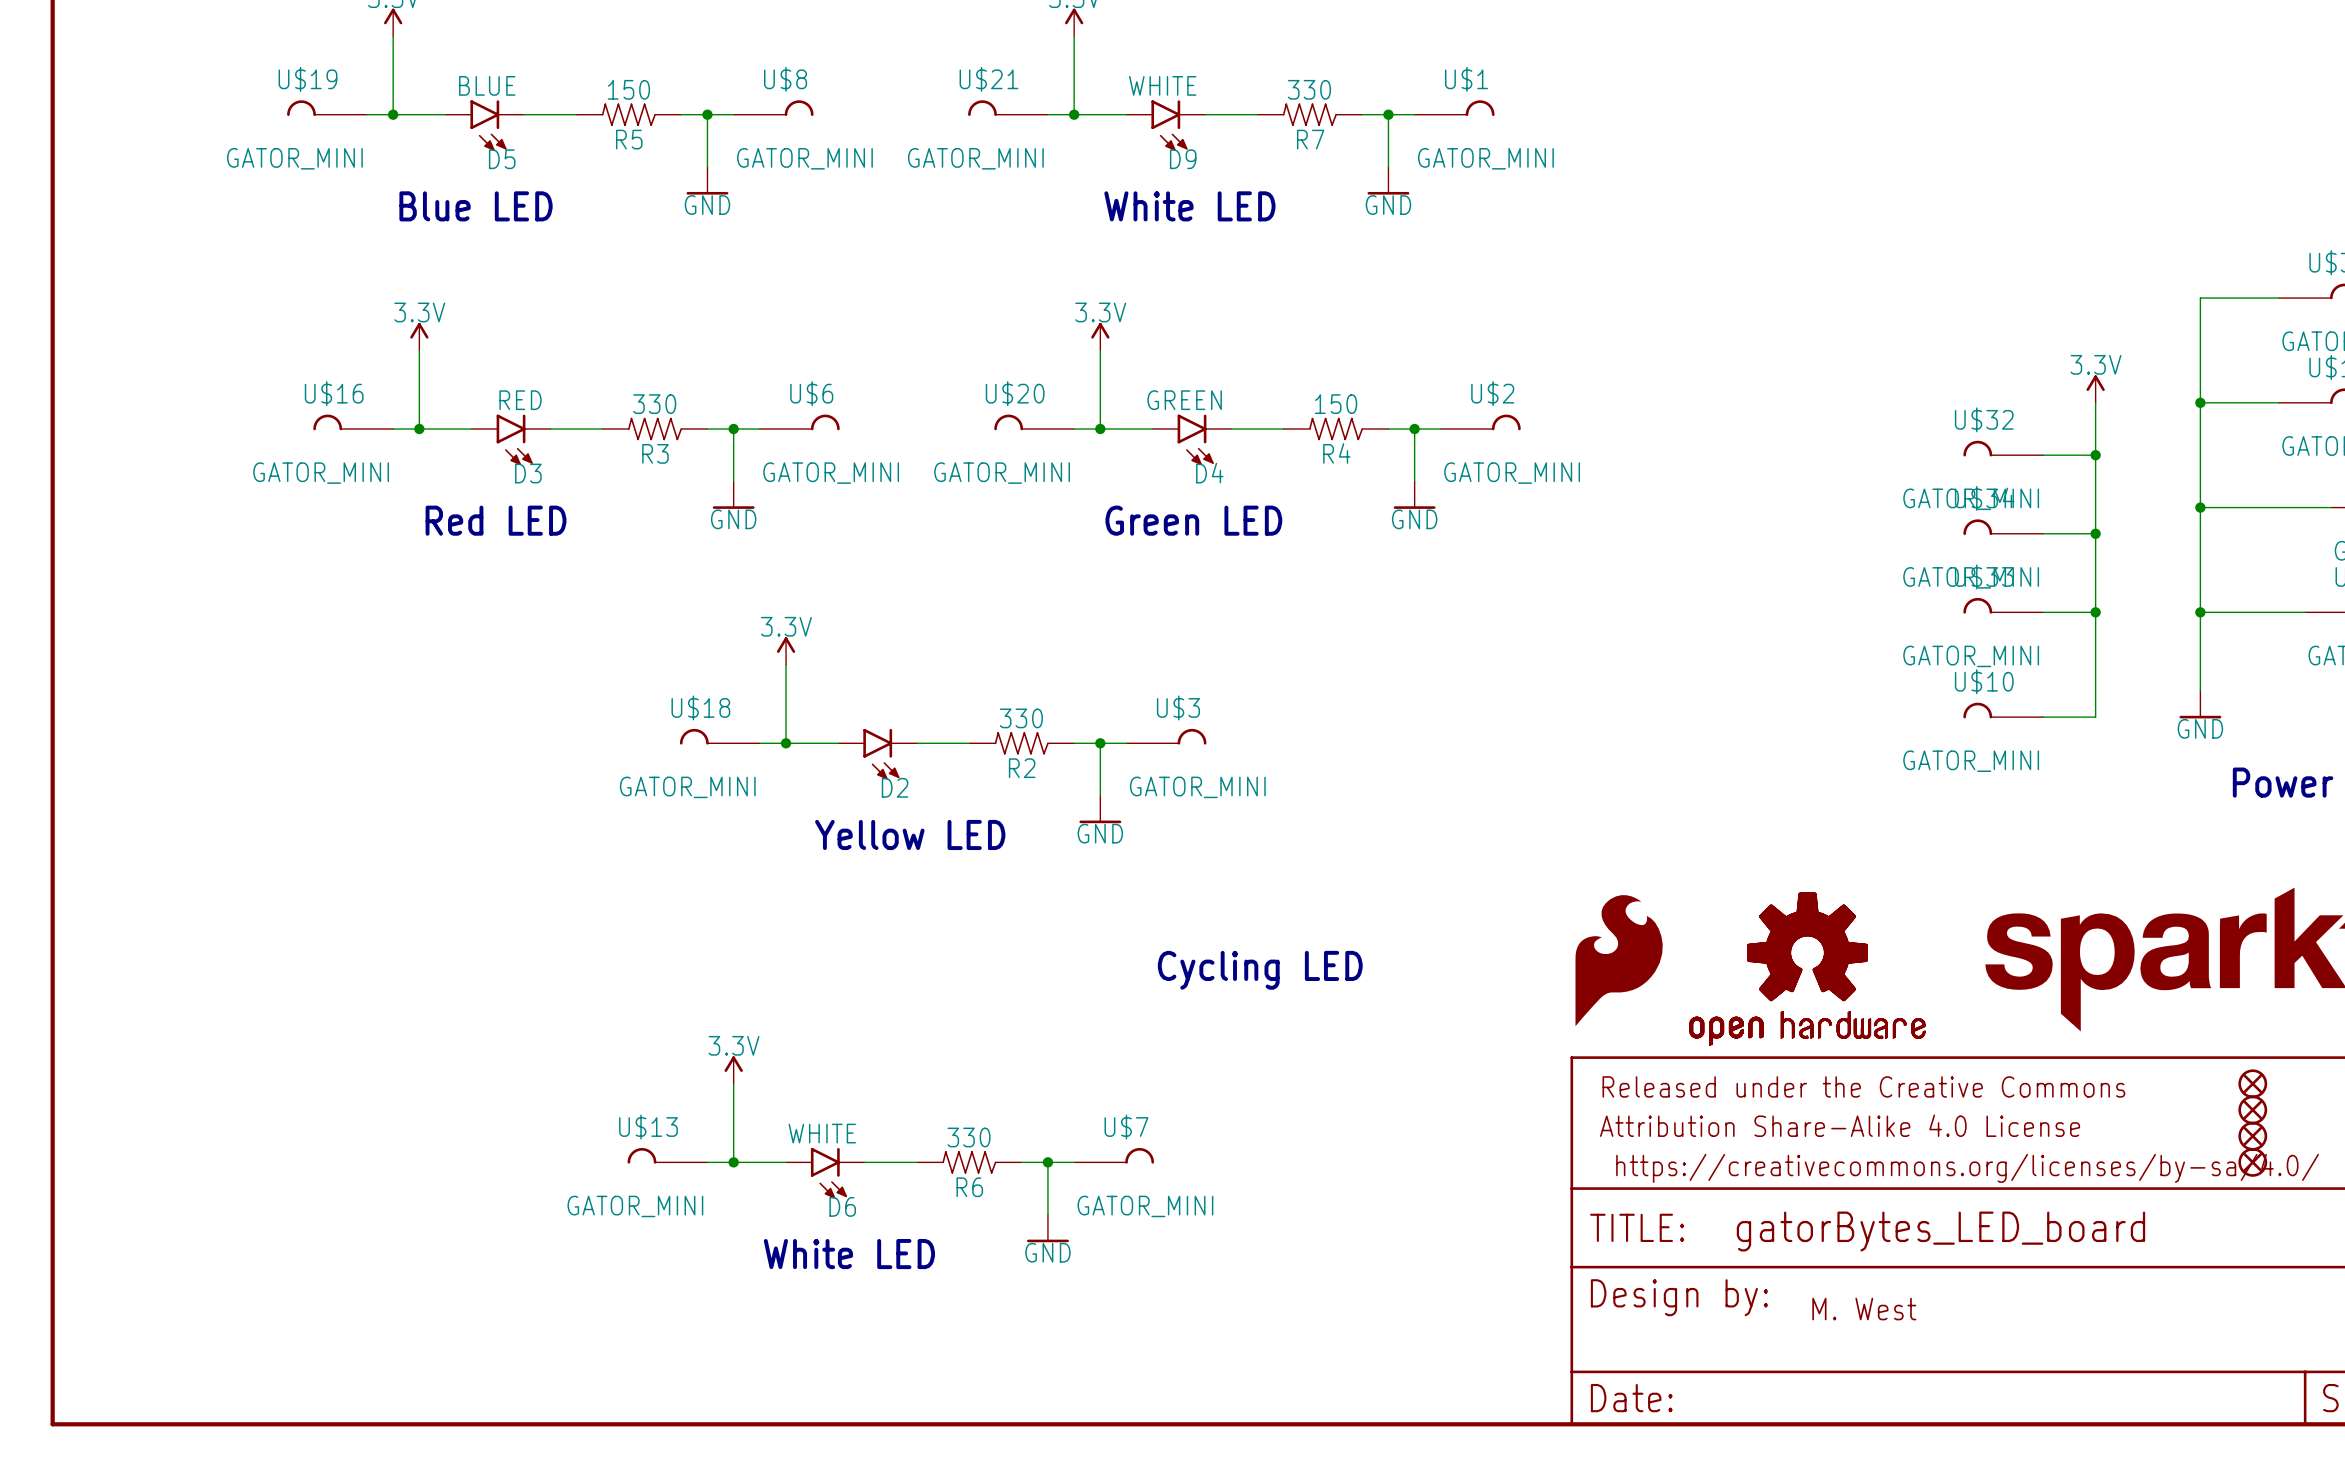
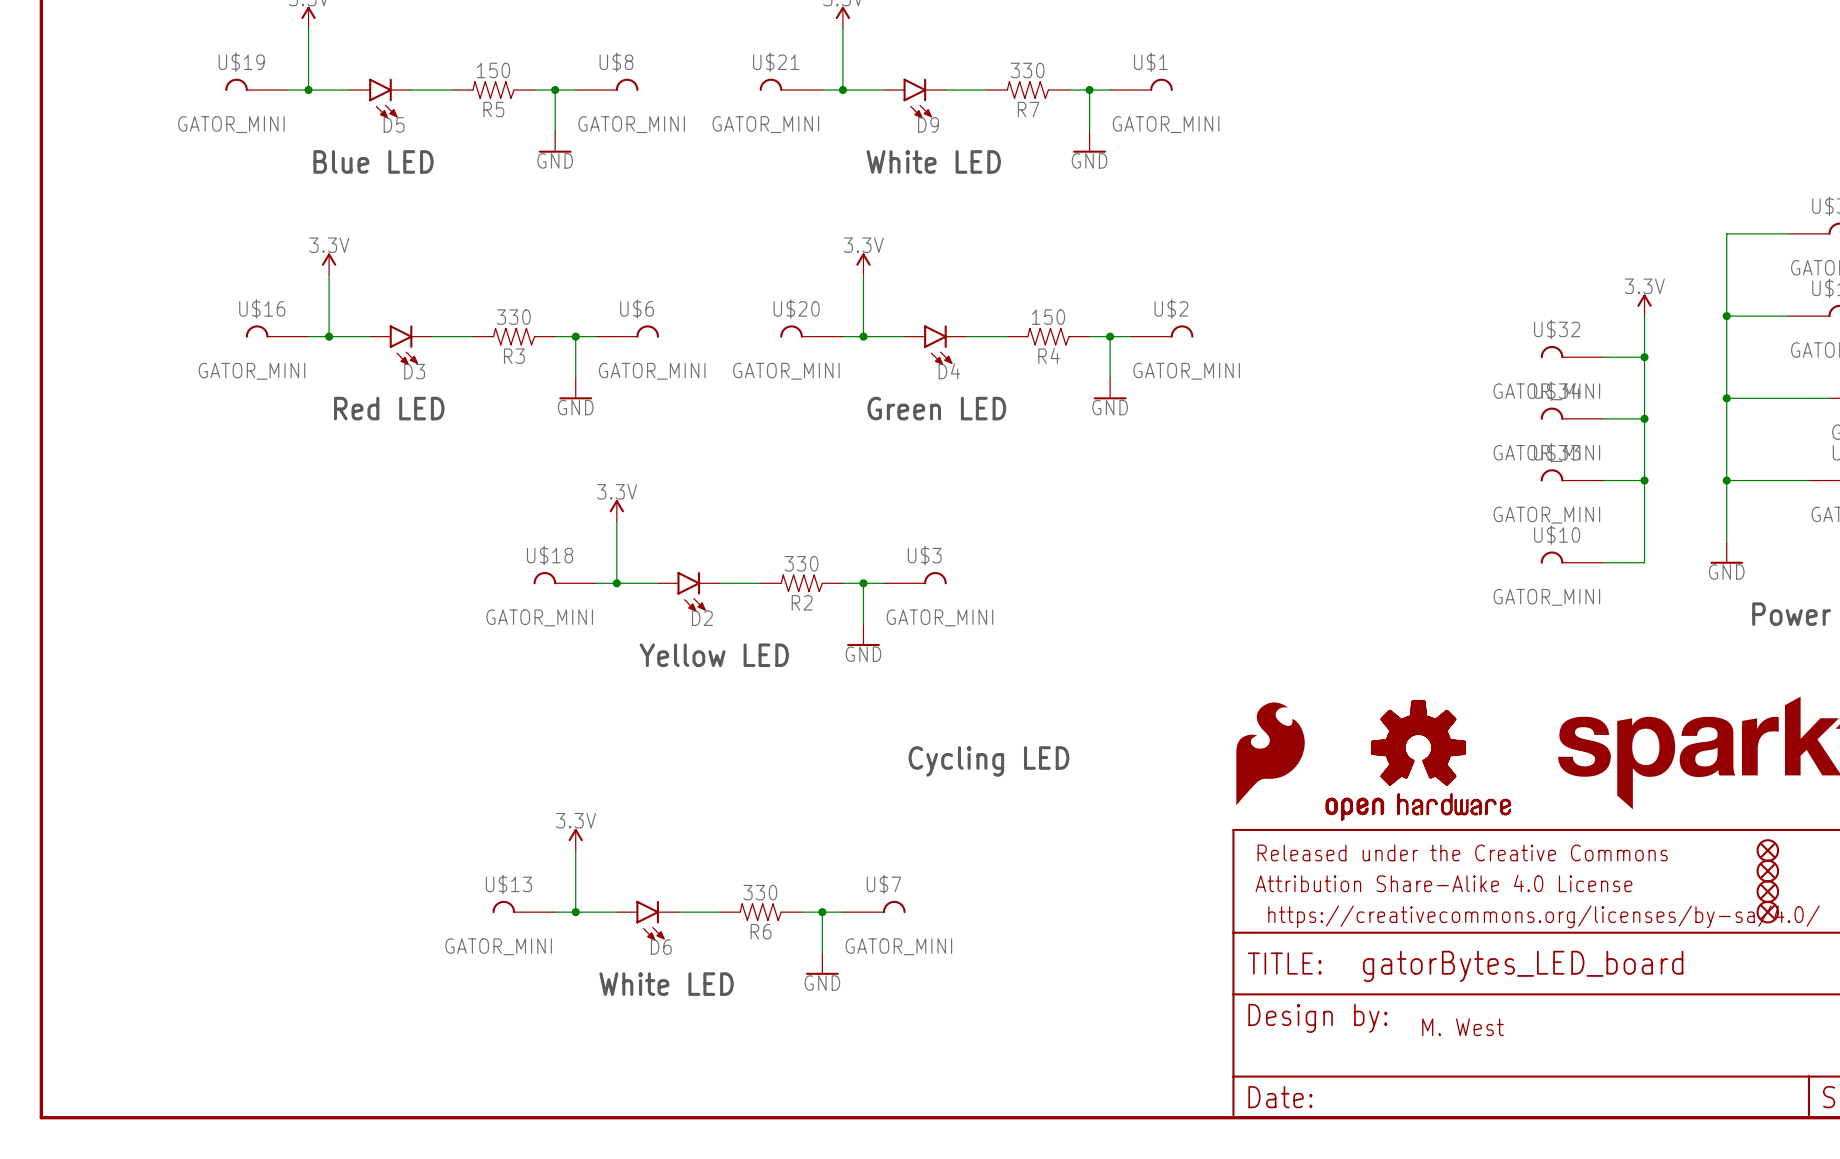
D5 value: BLUE (487, 85) -> none
D9 value: WHITE (1162, 85) -> none
D3 value: RED (520, 400) -> none
D4 value: GREEN (1184, 400) -> none
D6 value: WHITE (822, 1133) -> none

